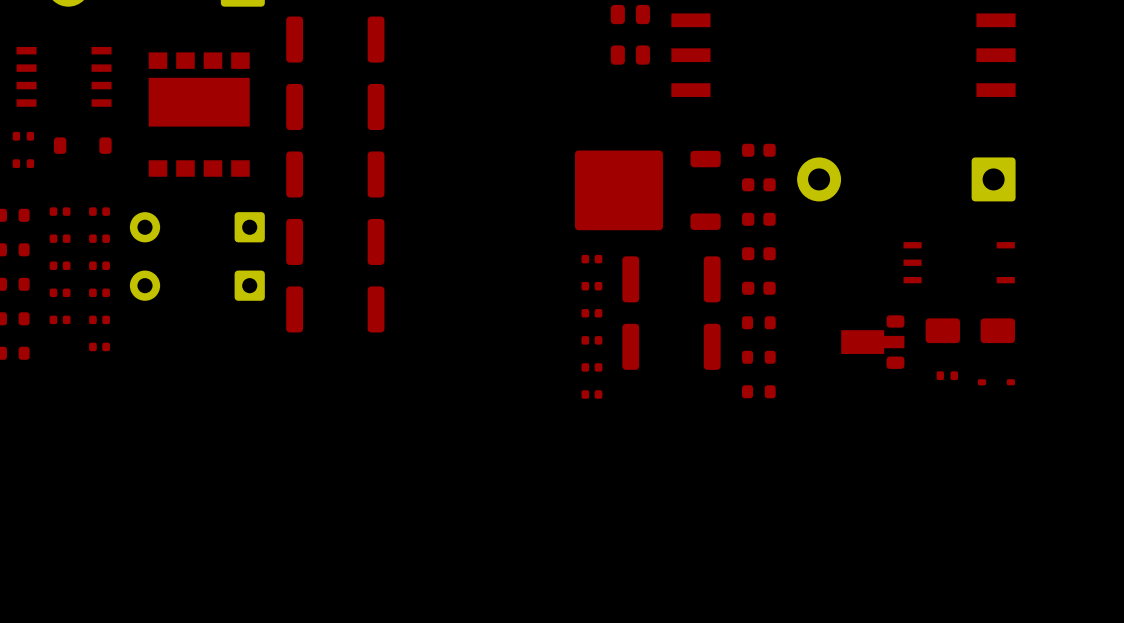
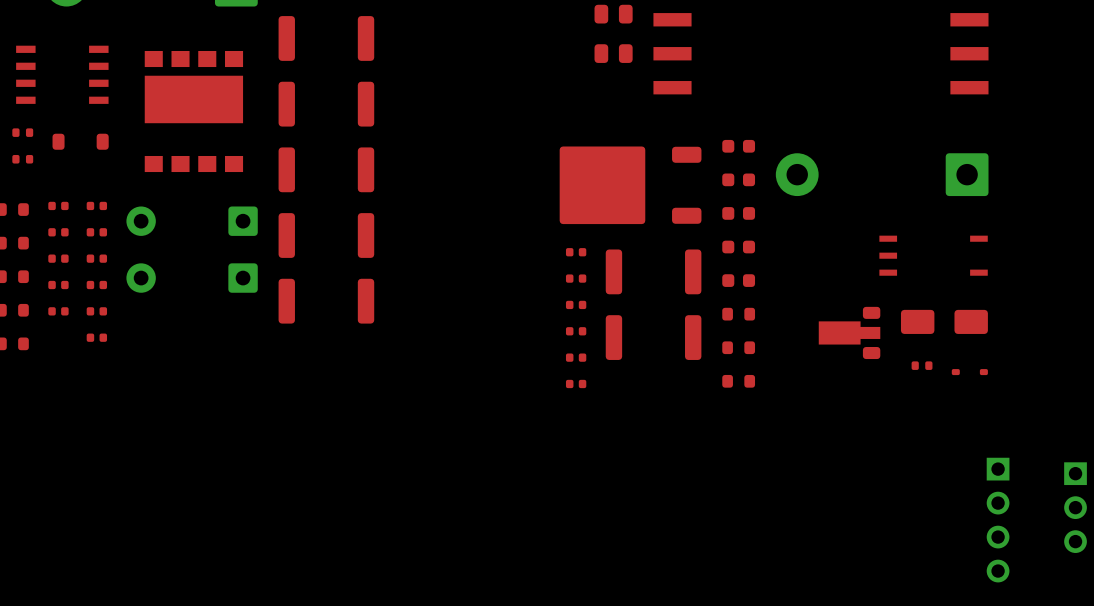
part: none -> (1075, 507)
part: none -> (998, 520)

